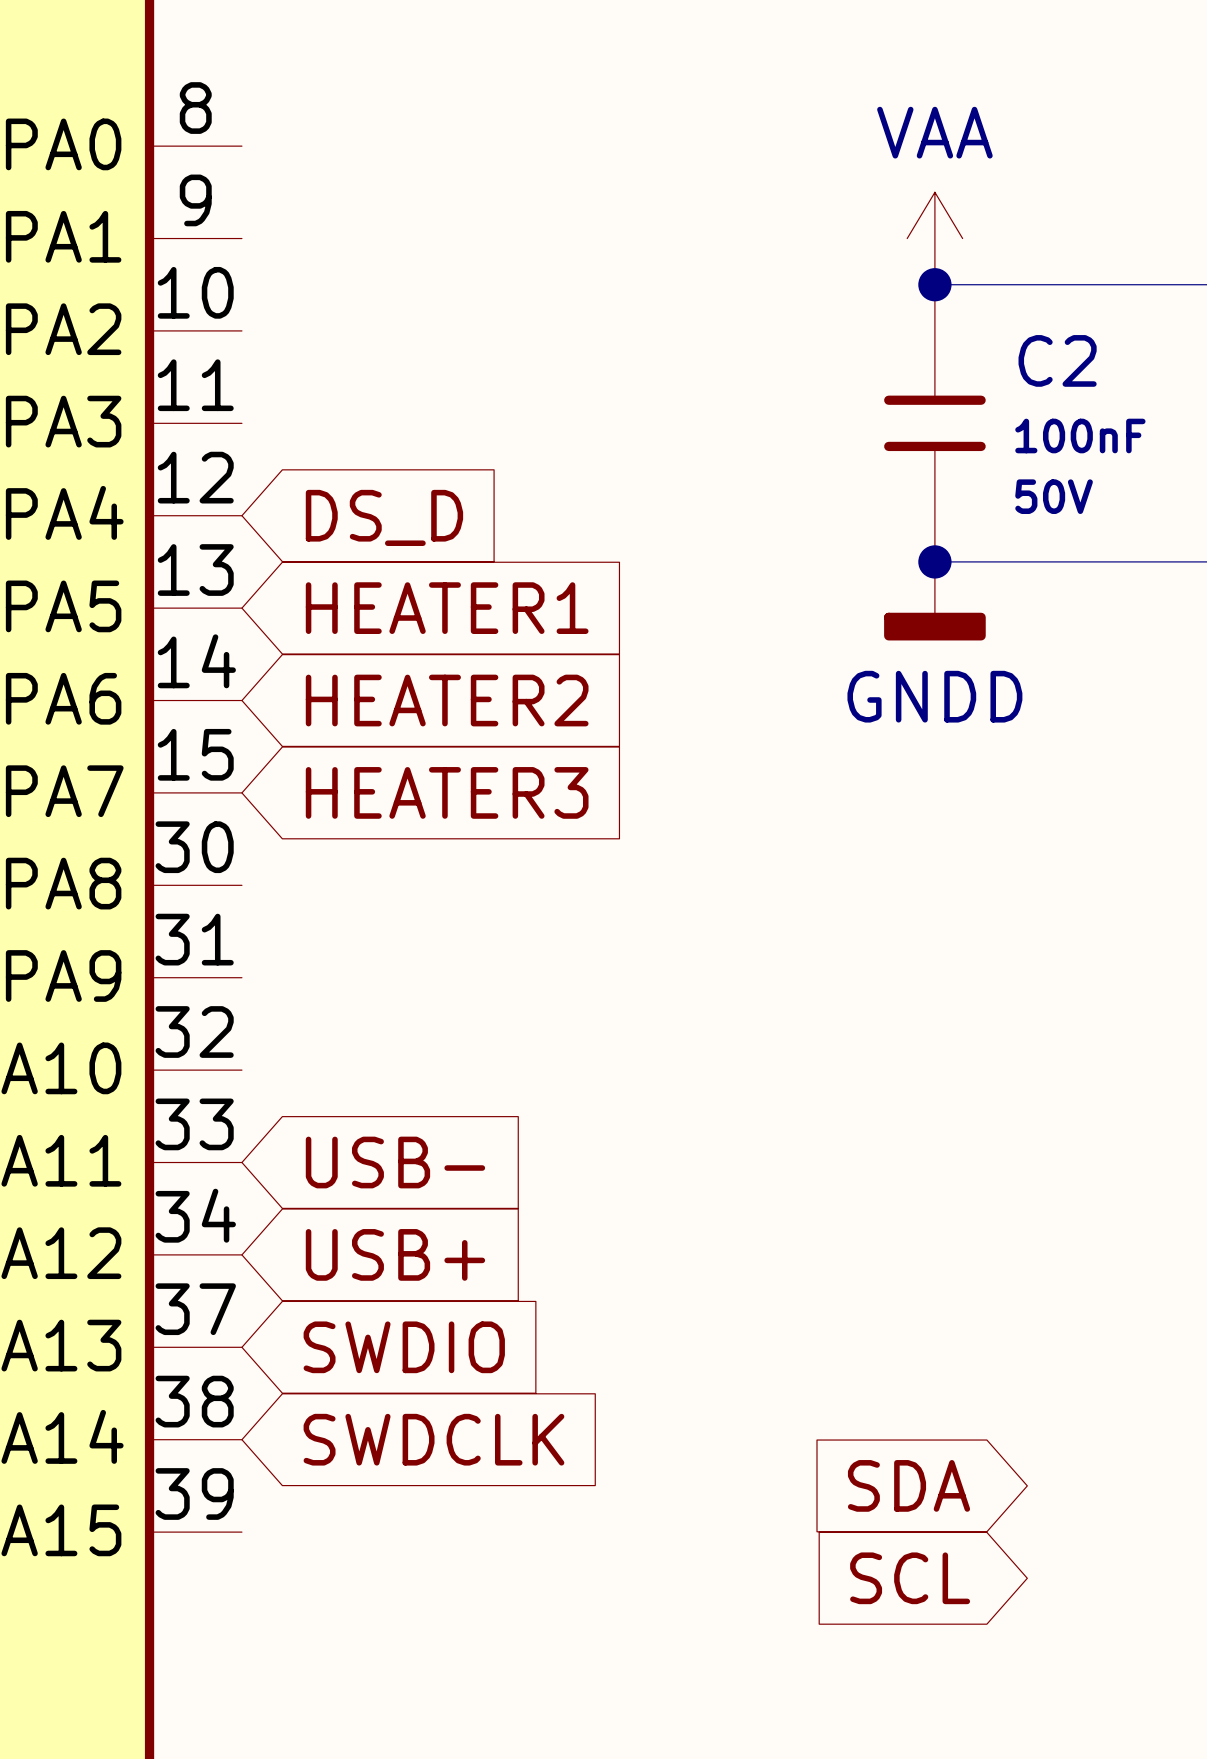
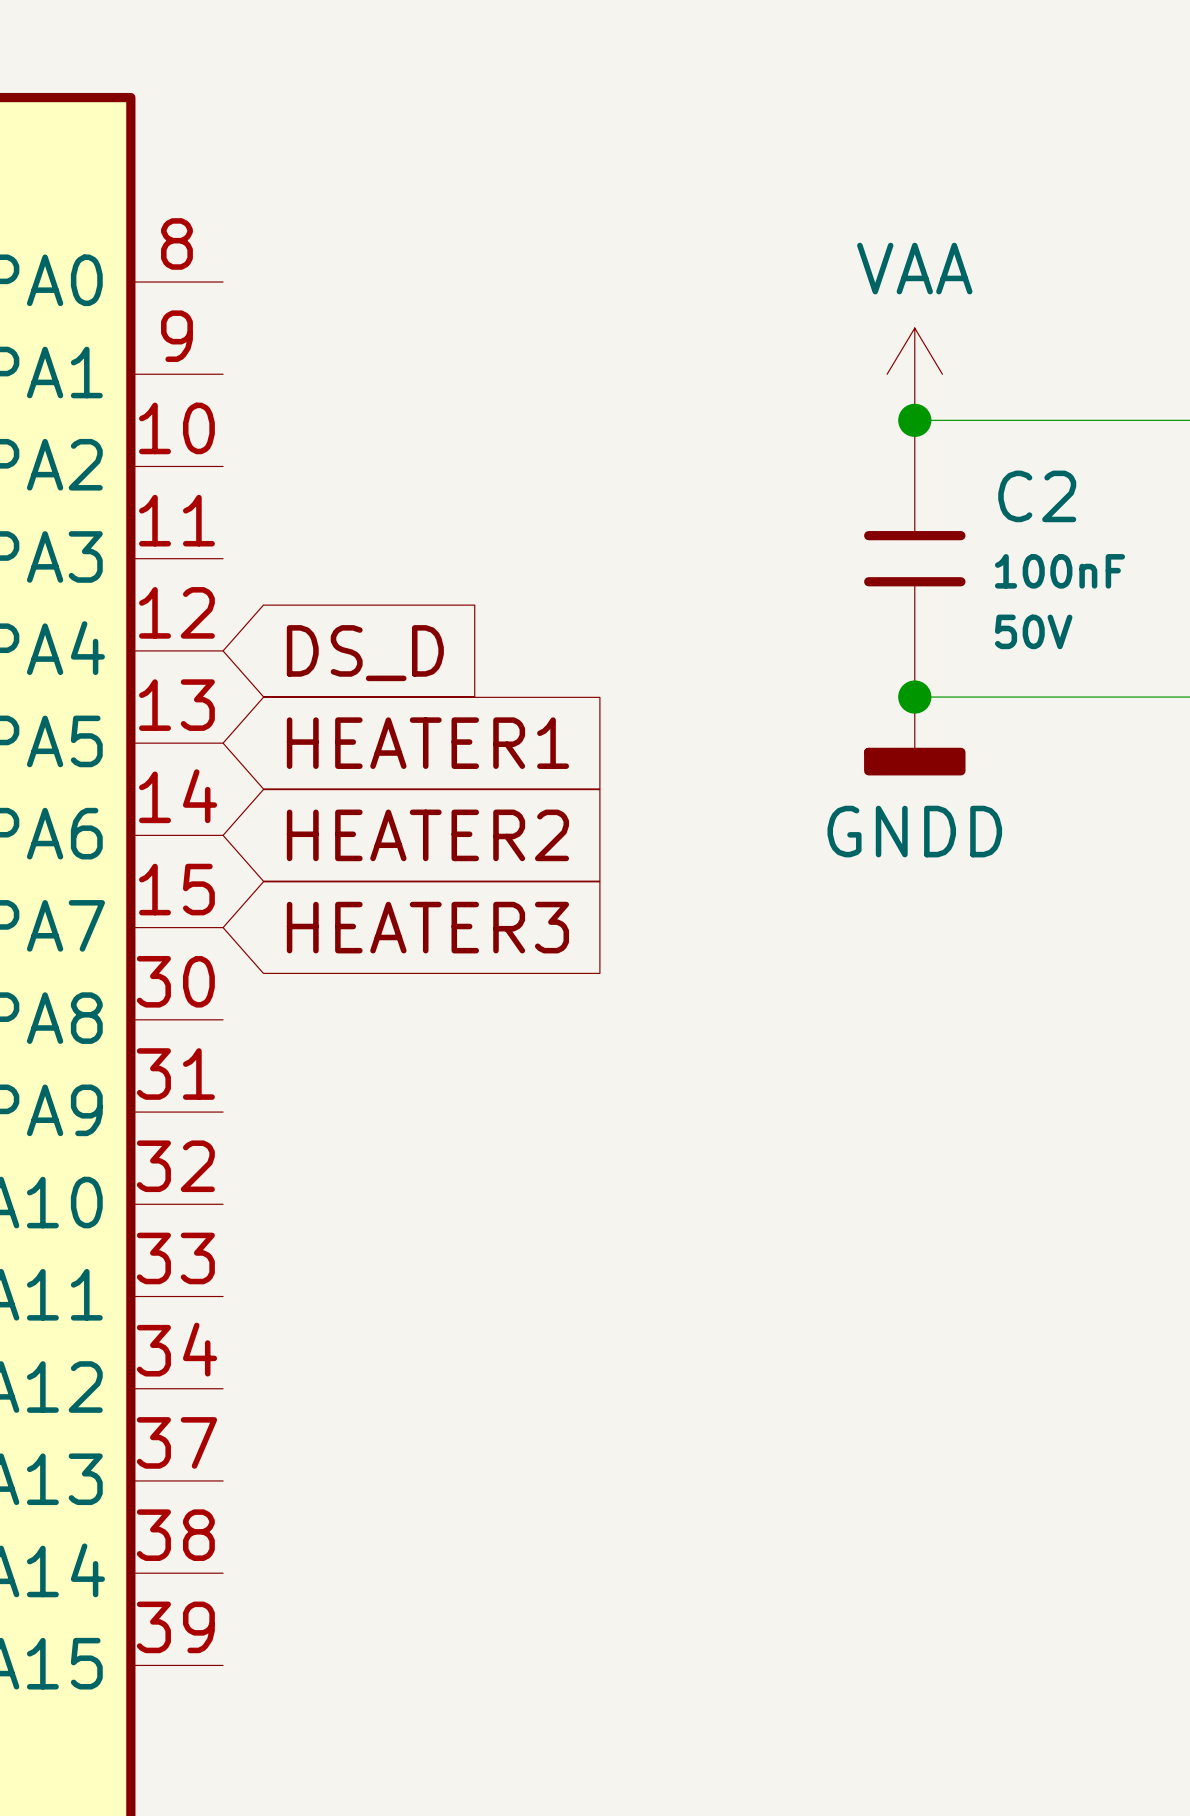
global label: USB- (395, 1162) -> none
global label: USB+ (395, 1254) -> none
global label: SWDIO (404, 1347) -> none
global label: SWDCLK (433, 1439) -> none
global label: SDA (909, 1485) -> none
global label: SCL (910, 1578) -> none

